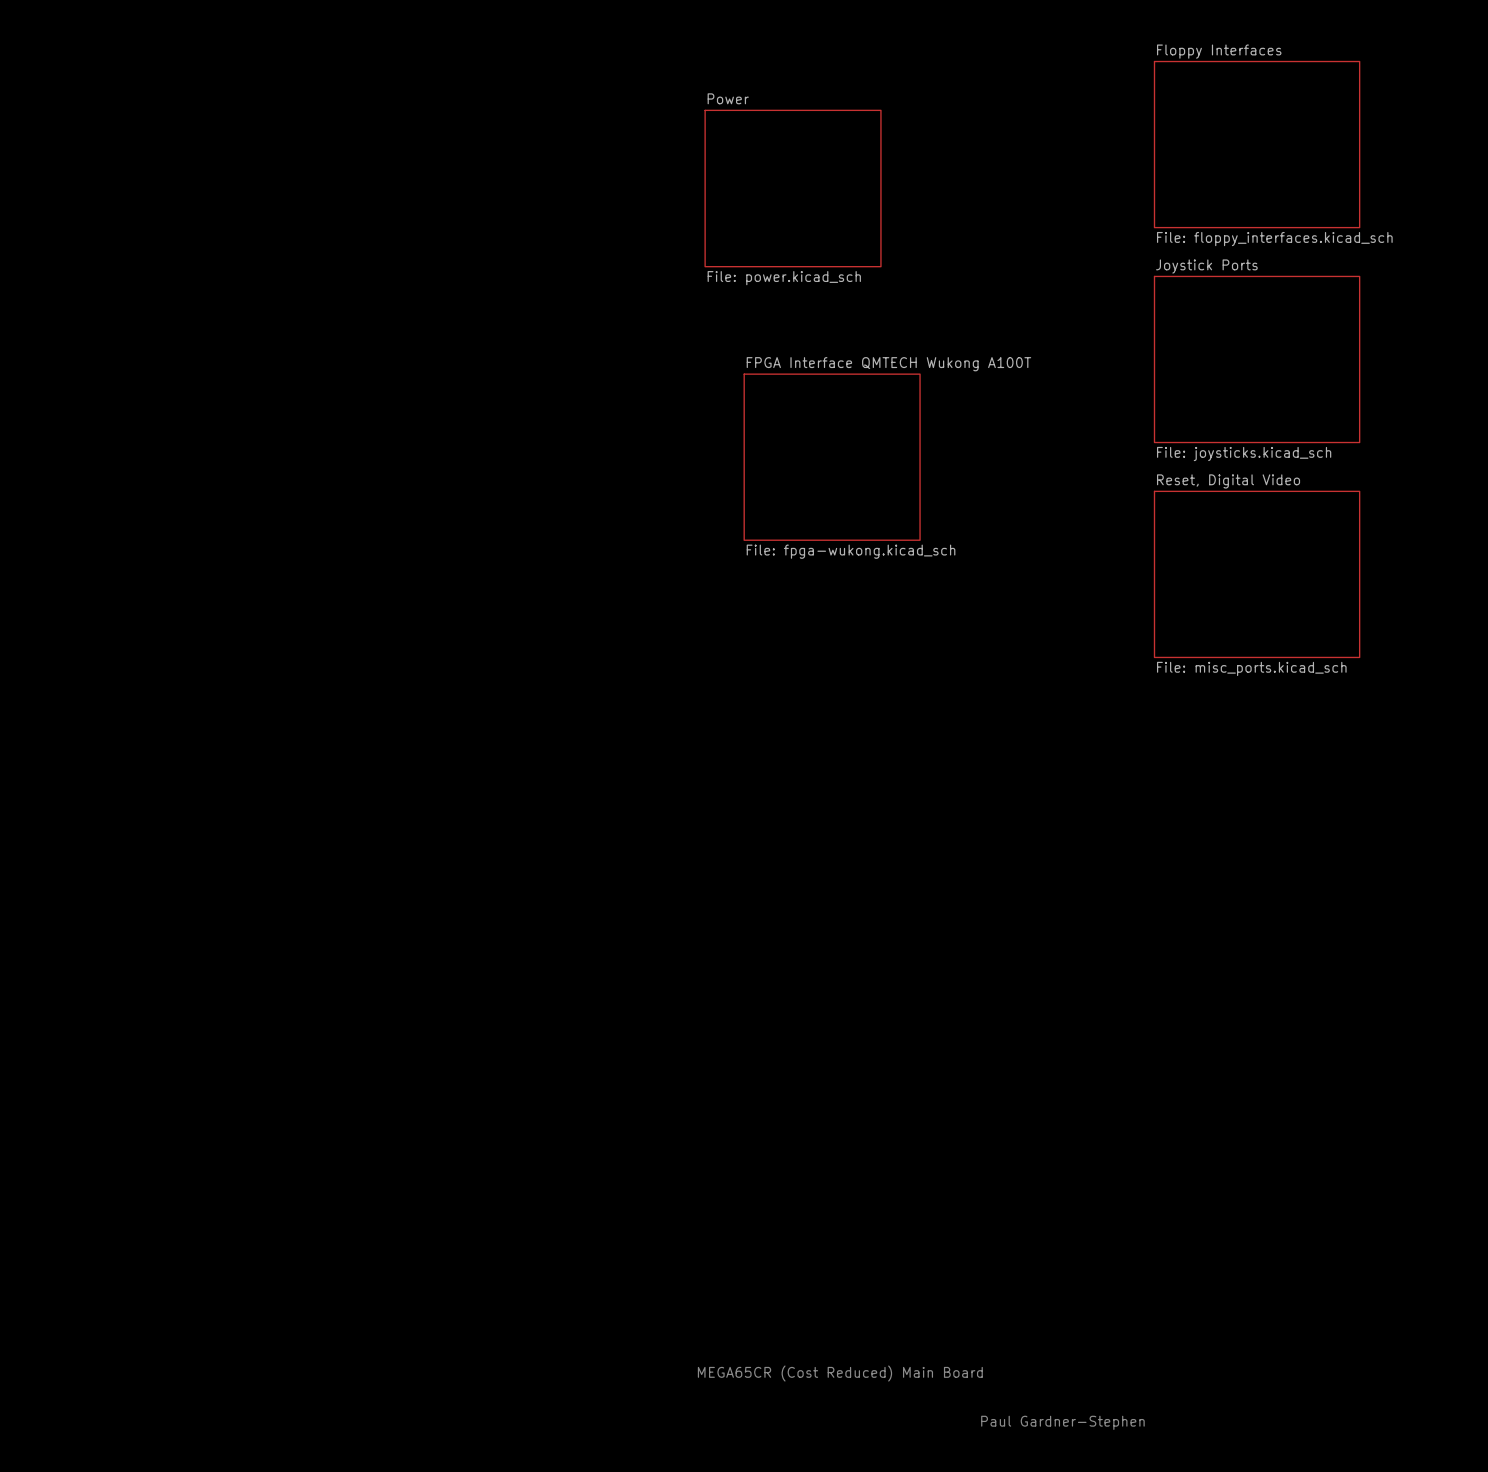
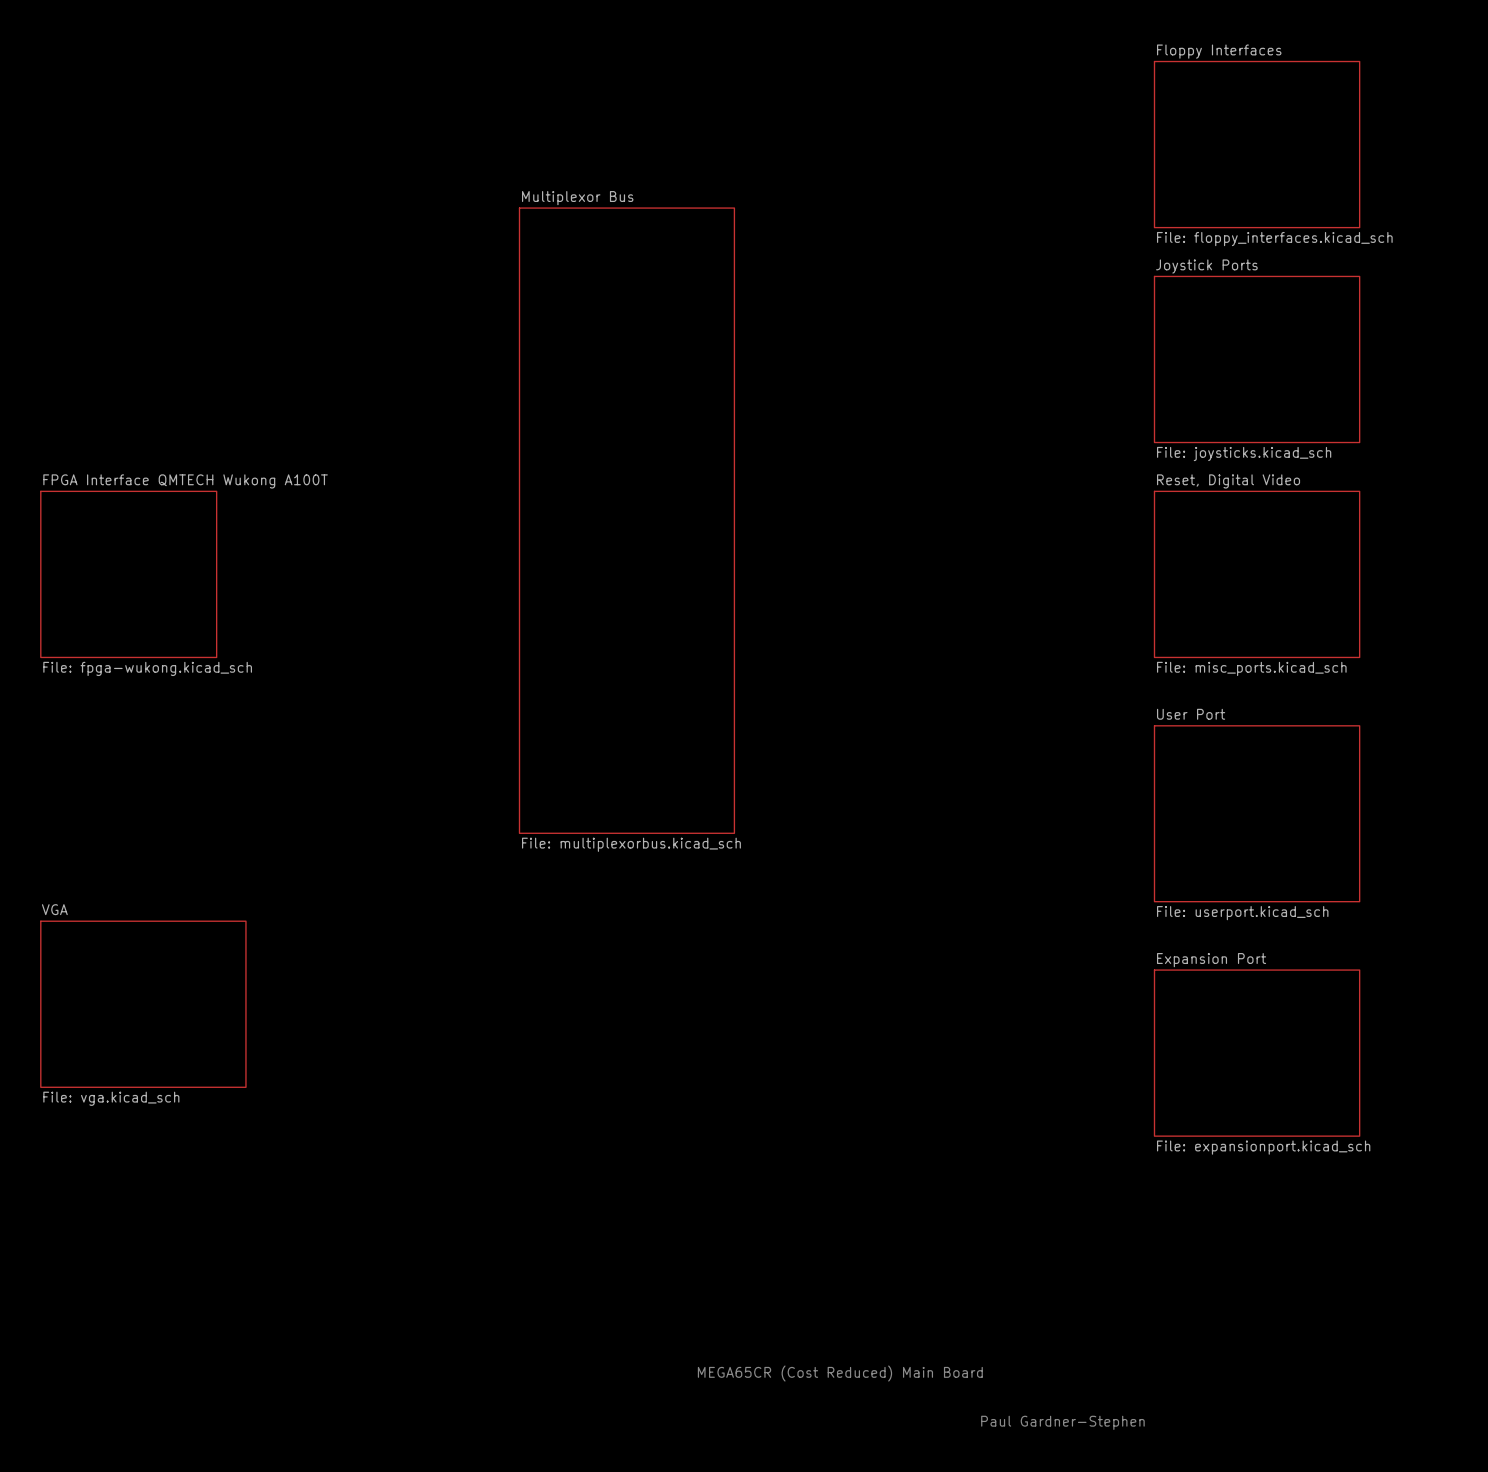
sheet Power: File: power.kicad_sch (793, 188) -> none
sheet FPGA Interface QMTECH Wukong A100T position: (832, 457) -> (128, 574)
sheet Multiplexor Bus: none -> File: multiplexorbus.kicad_sch (626, 520)
sheet User Port: none -> File: userport.kicad_sch (1257, 813)
sheet VGA: none -> File: vga.kicad_sch (143, 1004)
sheet Expansion Port: none -> File: expansionport.kicad_sch (1257, 1053)

